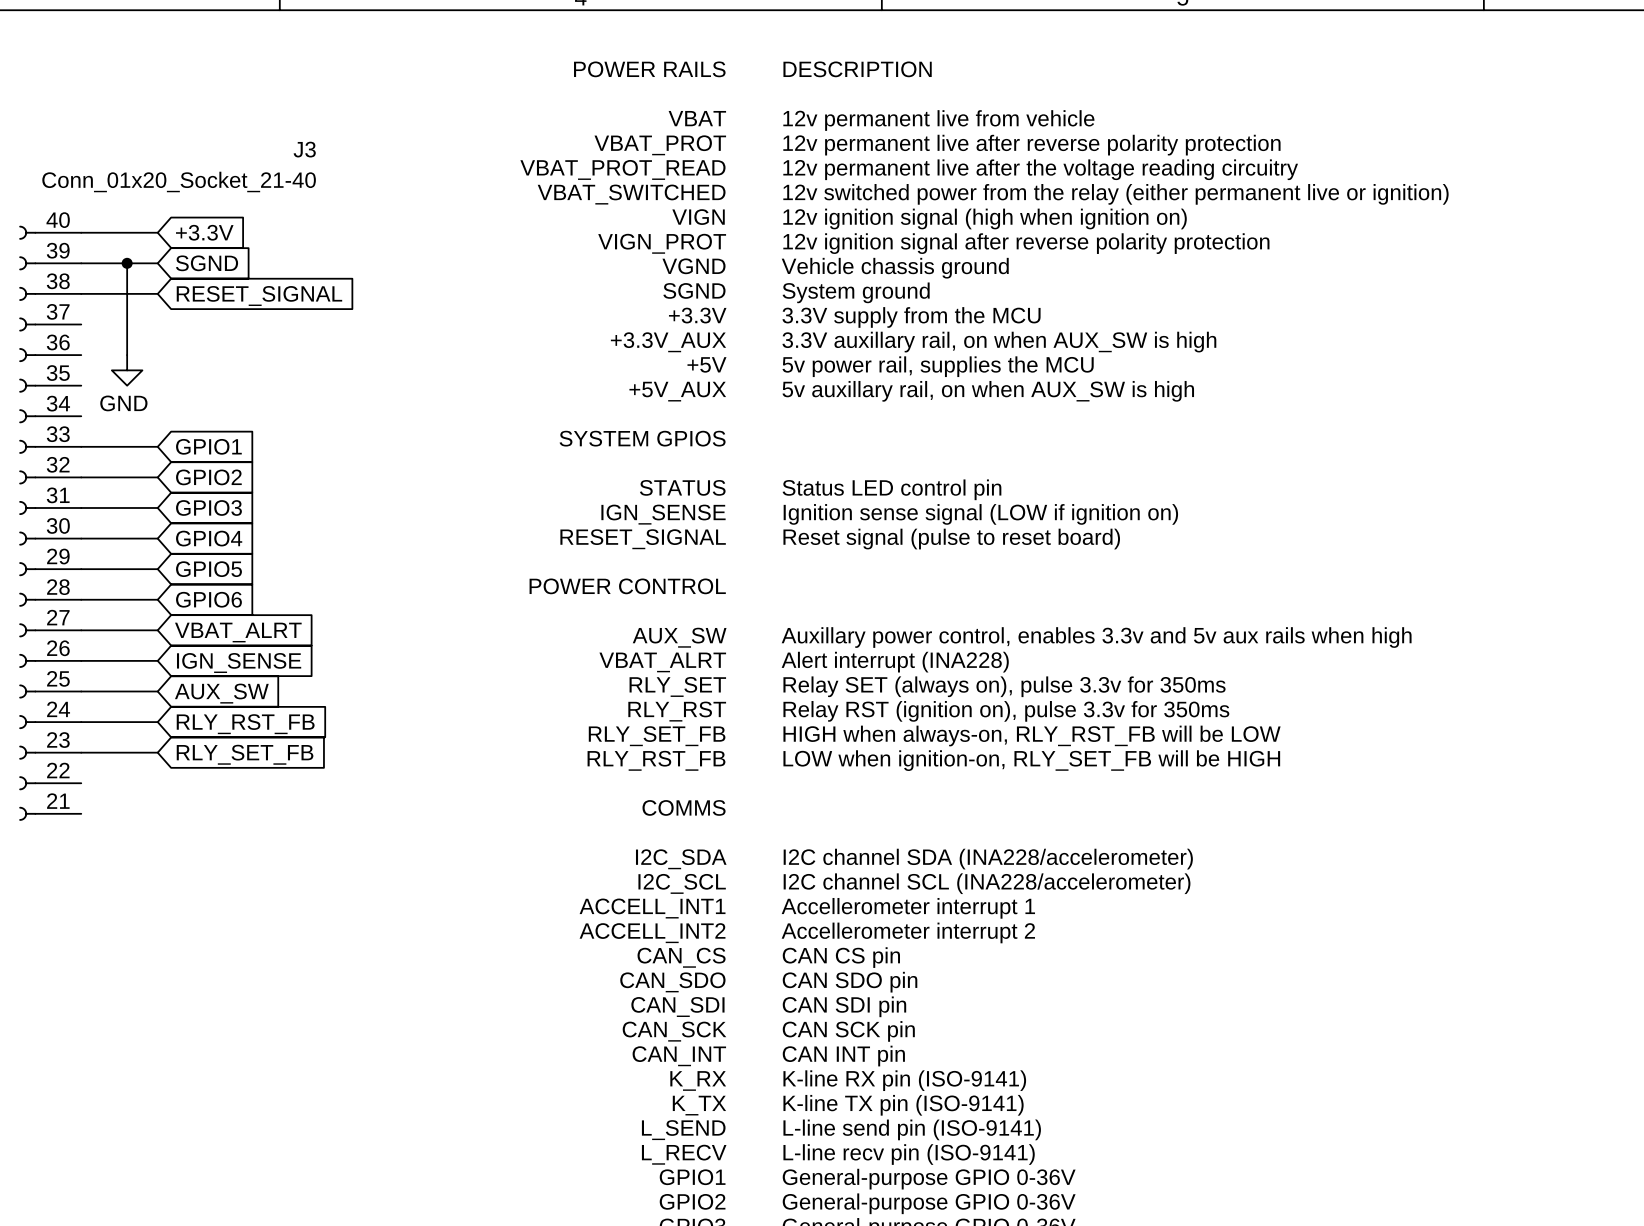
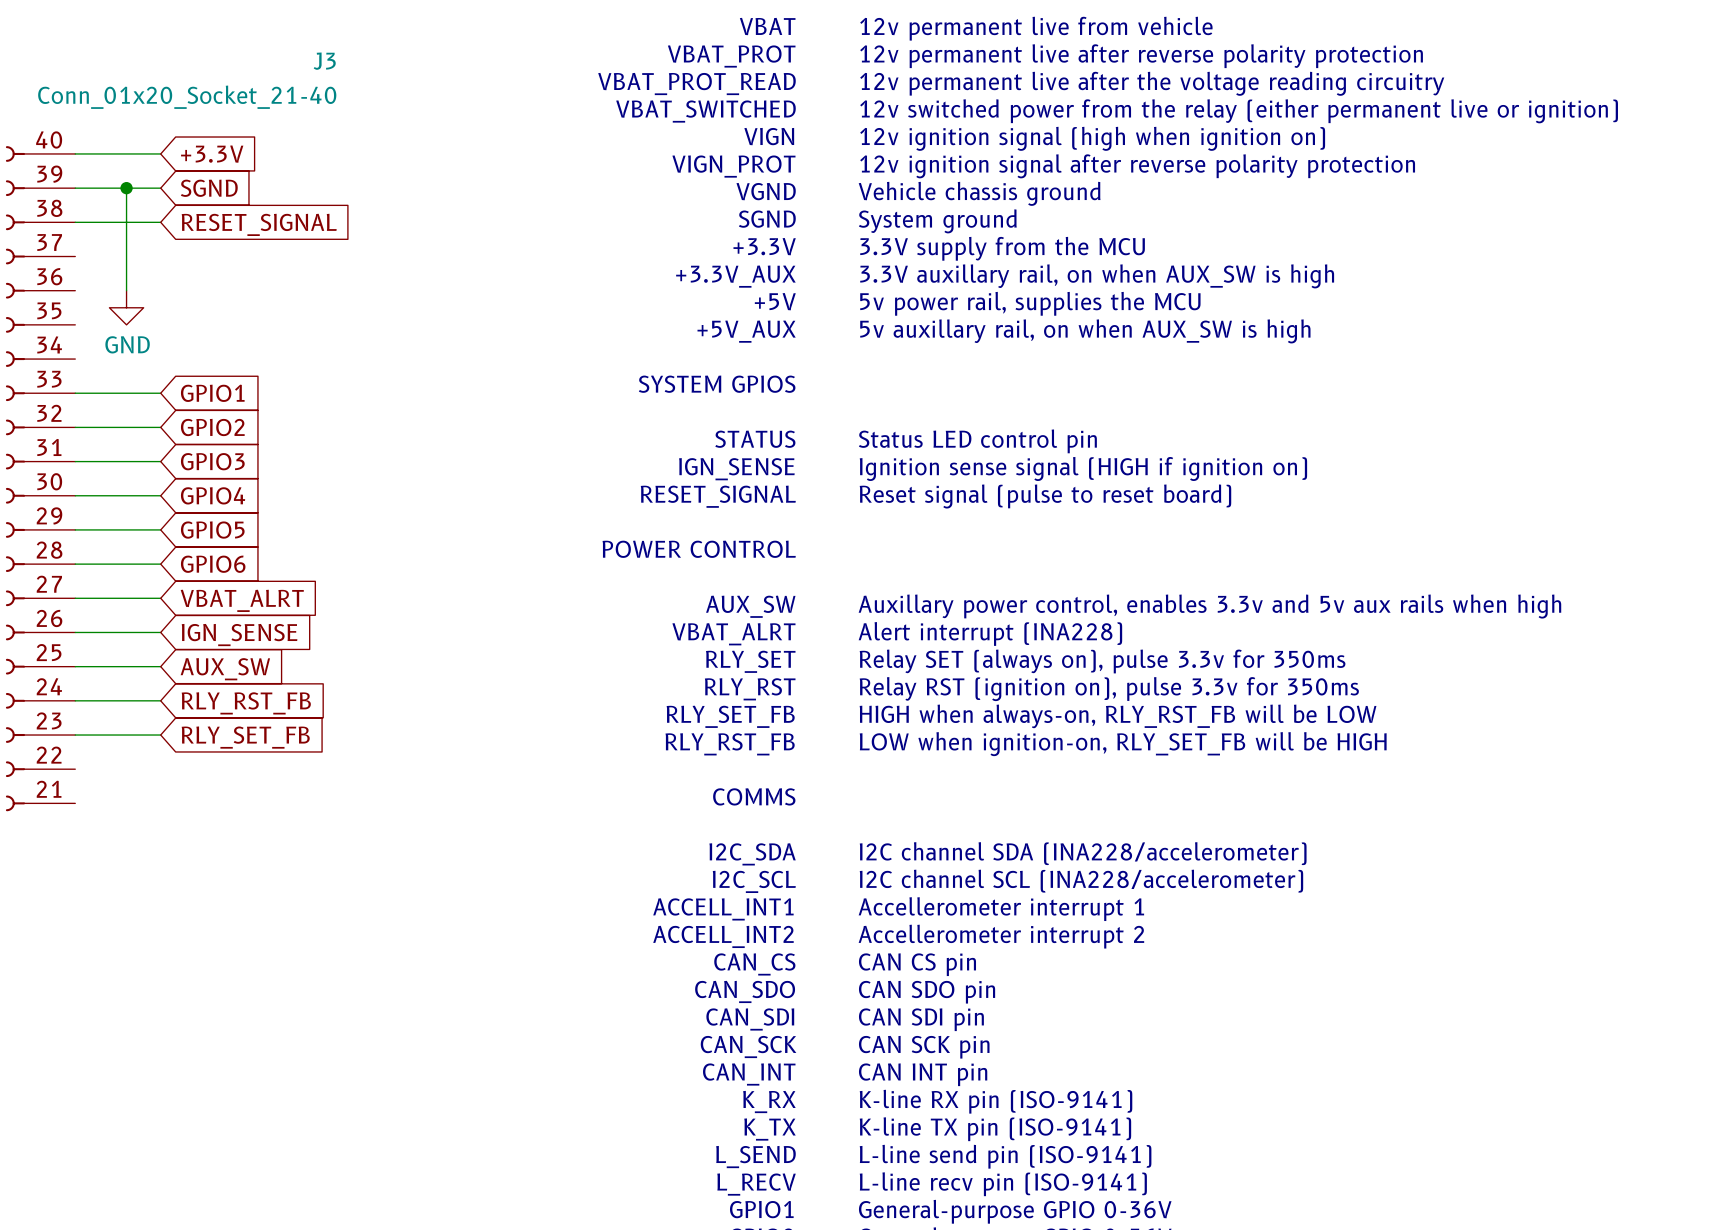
text: Ignition sense signal (LOW if ignition on) (980, 514) -> Ignition sense signal (HIGH if ignition on) (1083, 468)

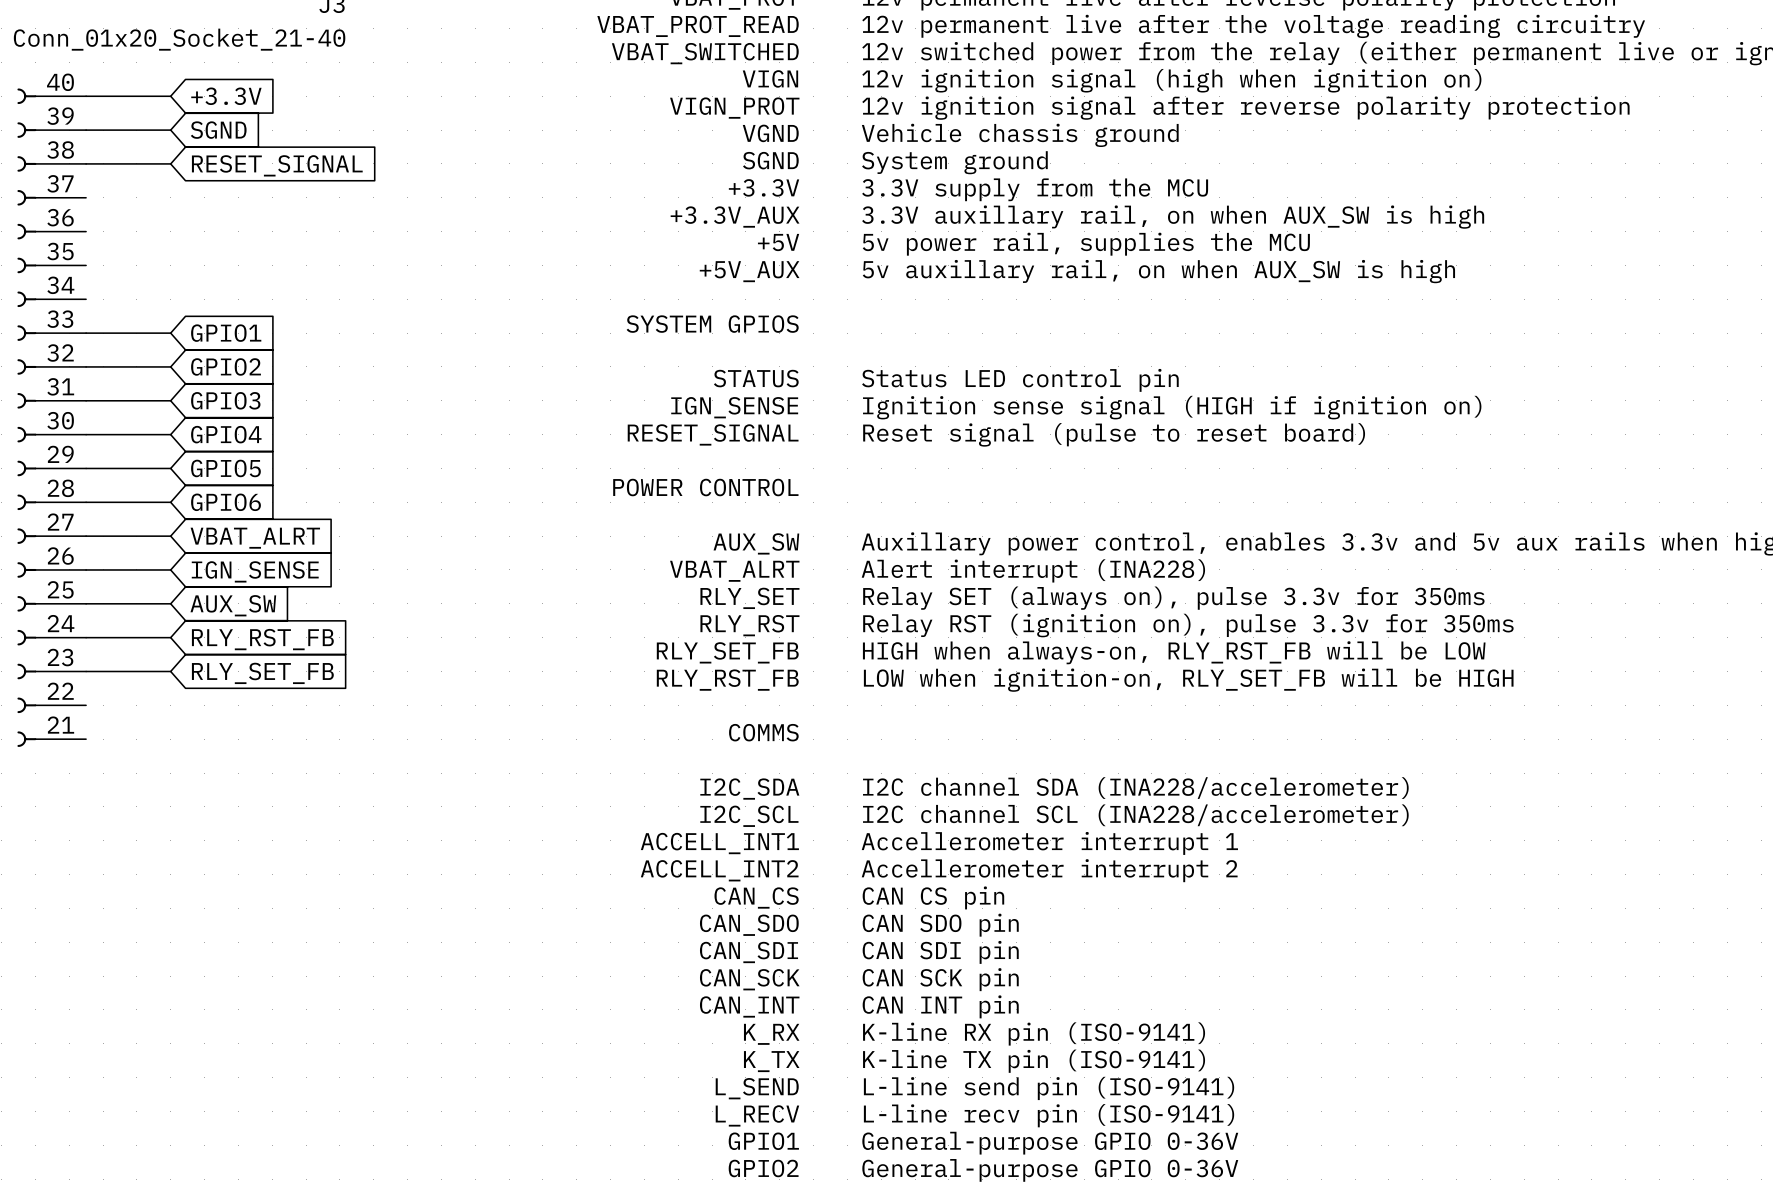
wire: (126, 188) (126, 290) -> none
junction: (126, 188) -> none
power symbol: GND (126, 307) -> none

